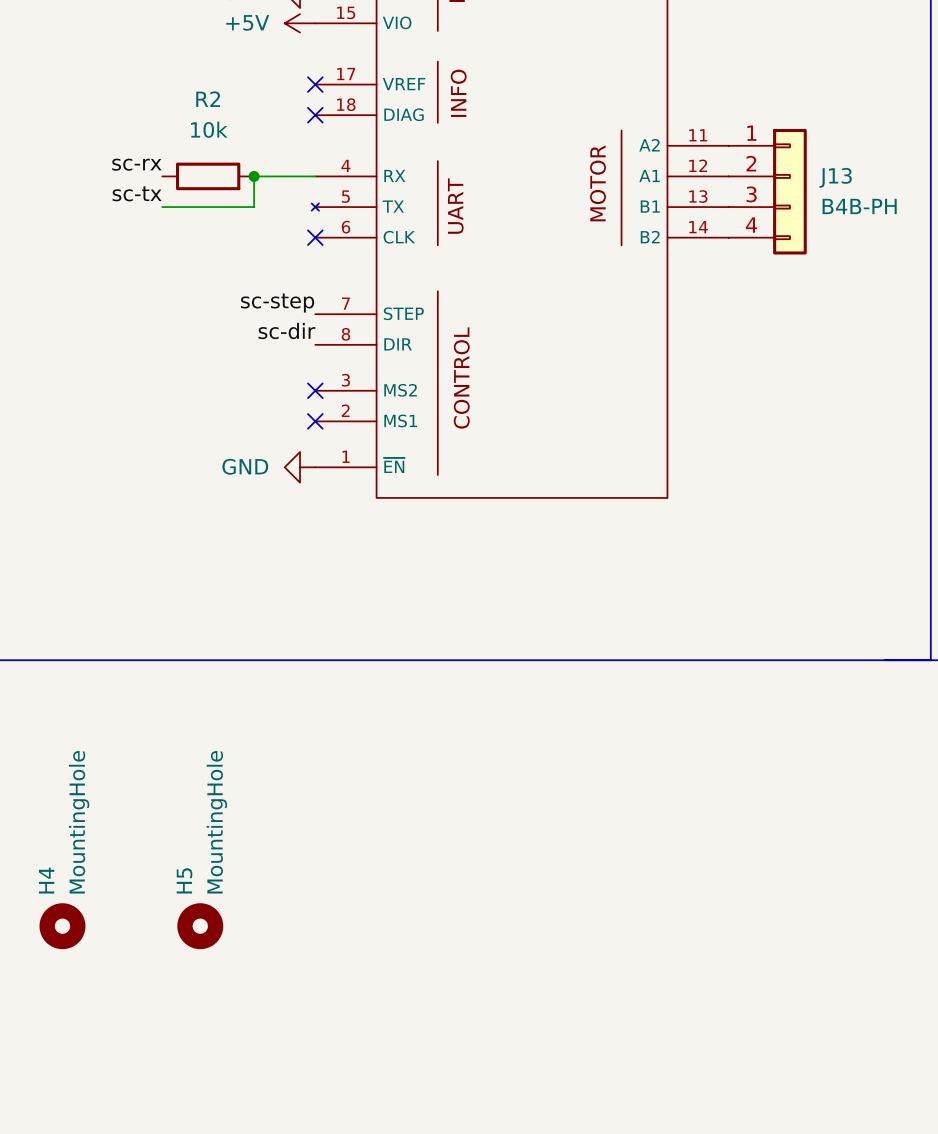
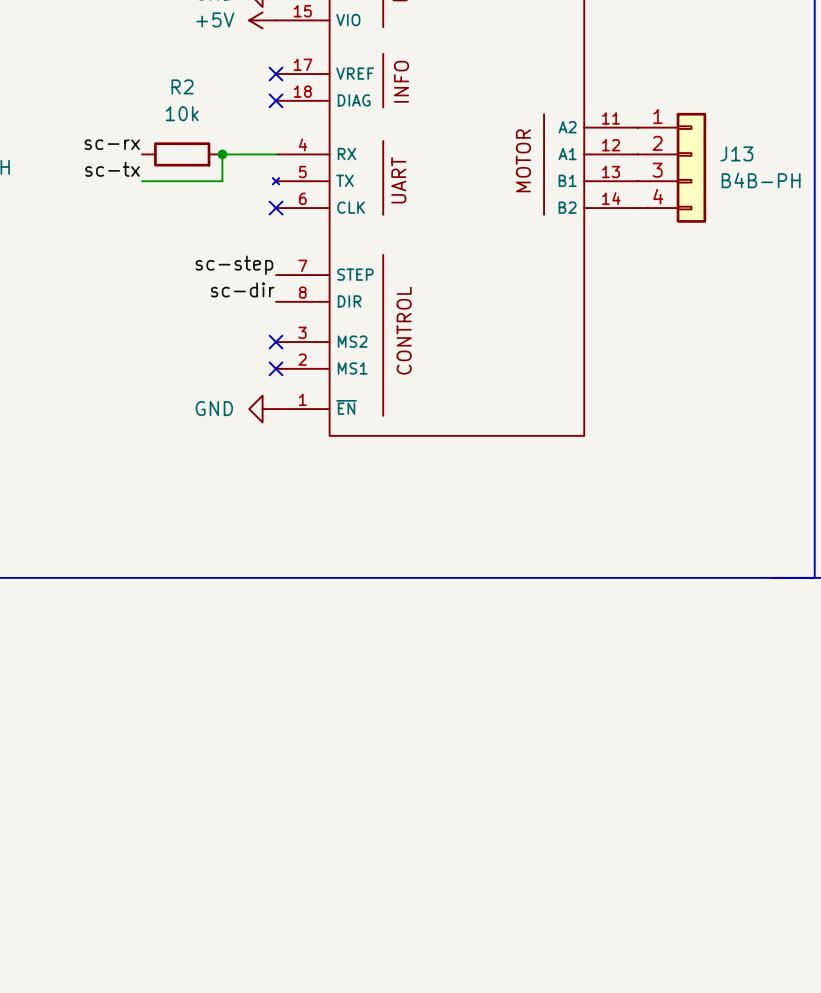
H4: MountingHole (62, 926) -> none
H5: MountingHole (200, 926) -> none

